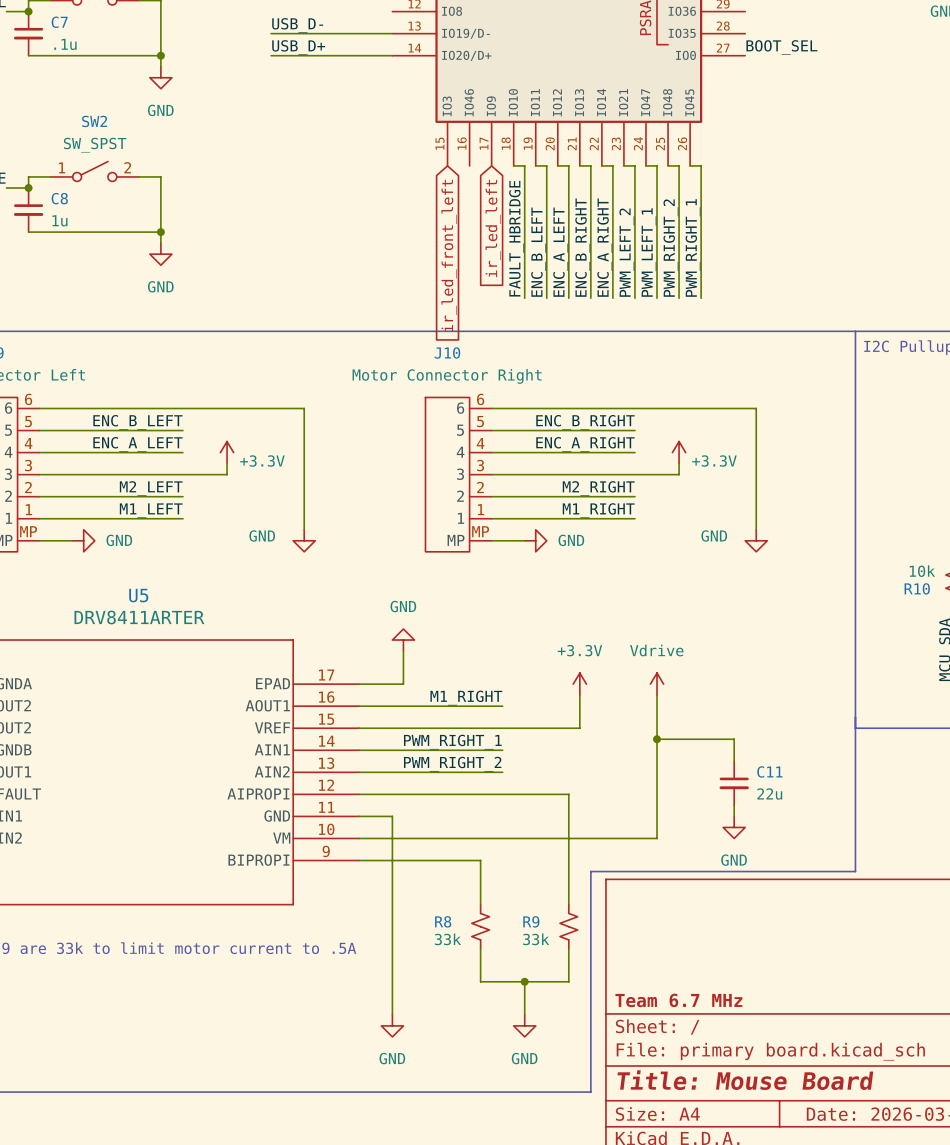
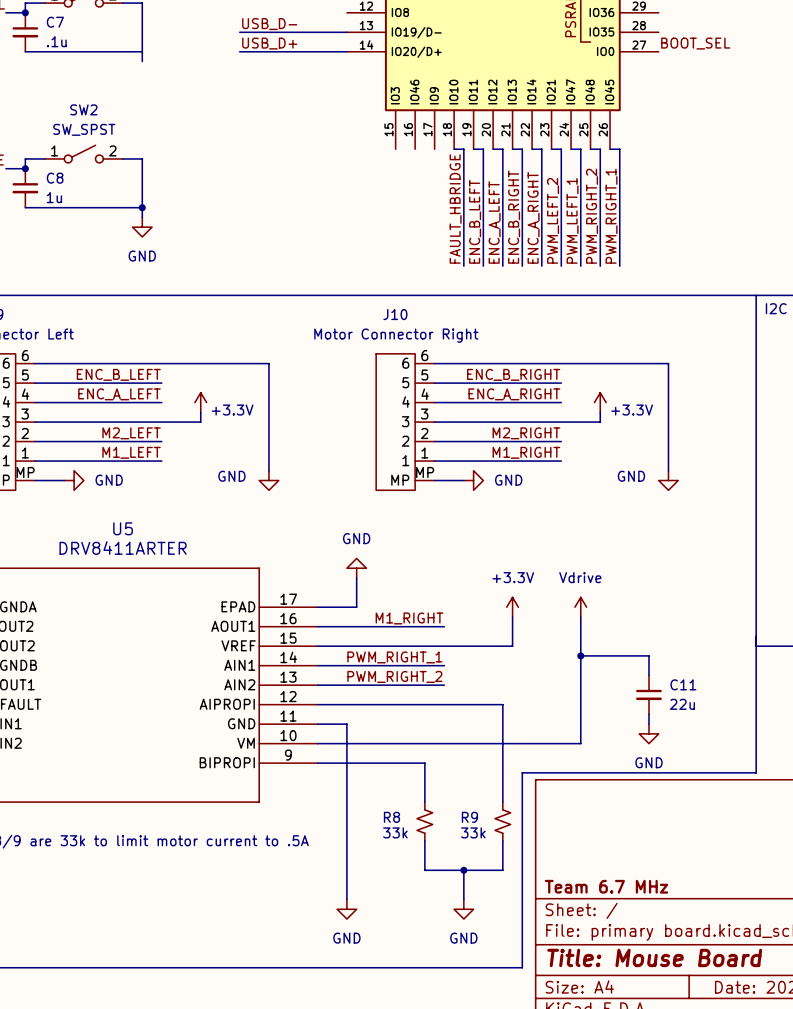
junction: (160, 55) -> none
power symbol: GND (160, 77) -> none
global label: ir_led_left (493, 228) -> none
global label: ir_led_front_left (449, 255) -> none

